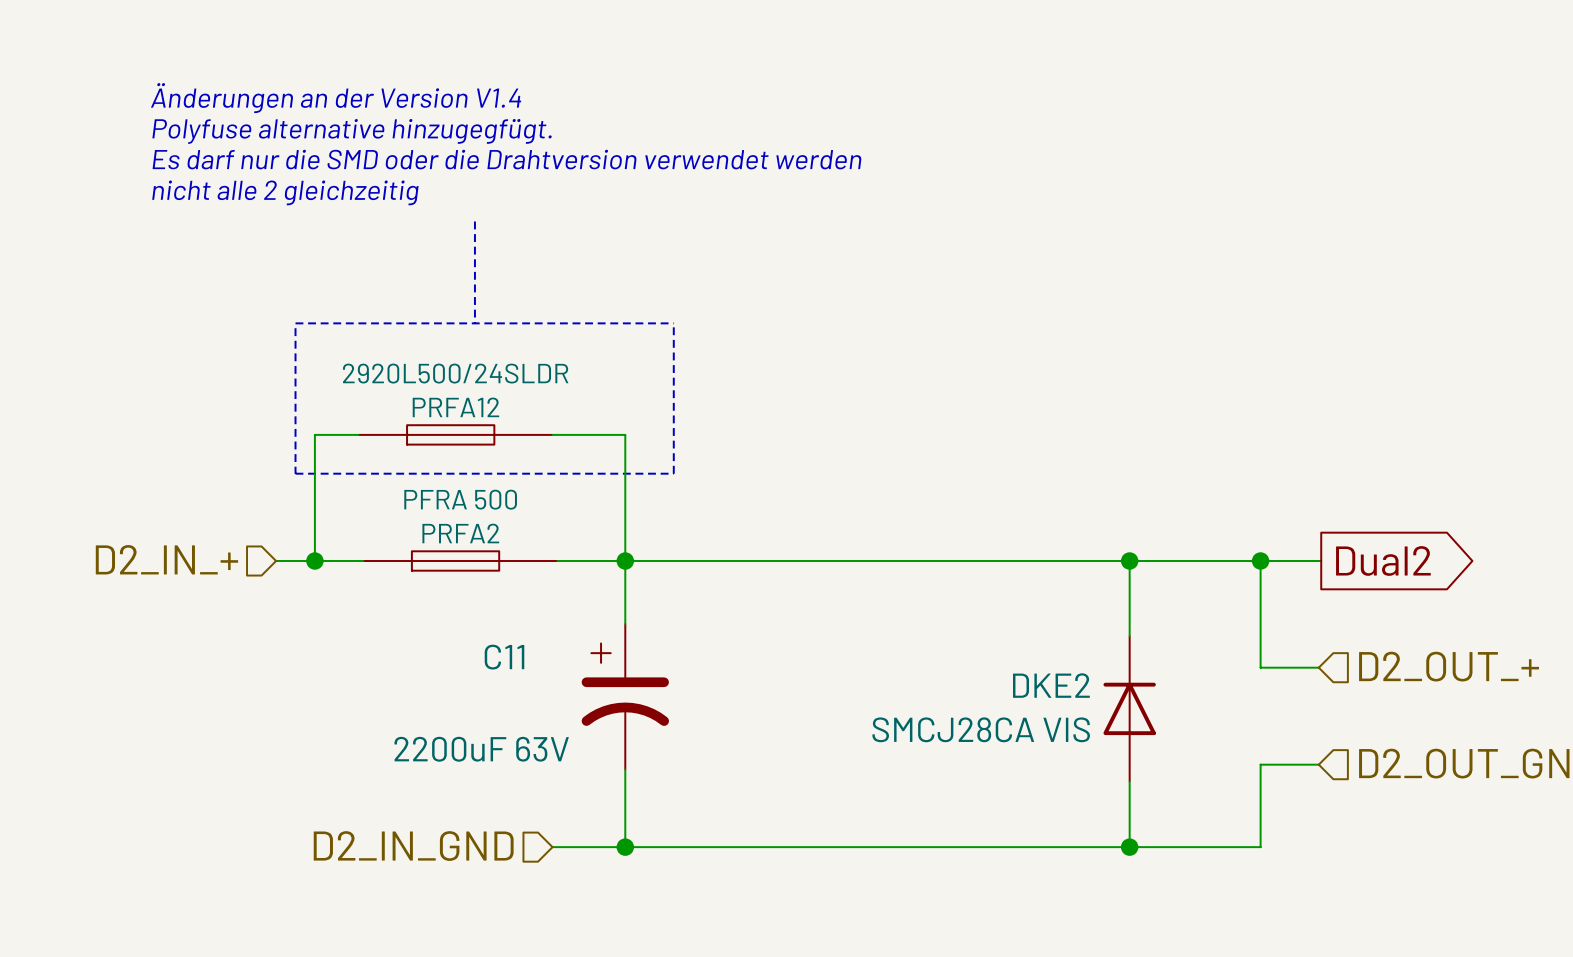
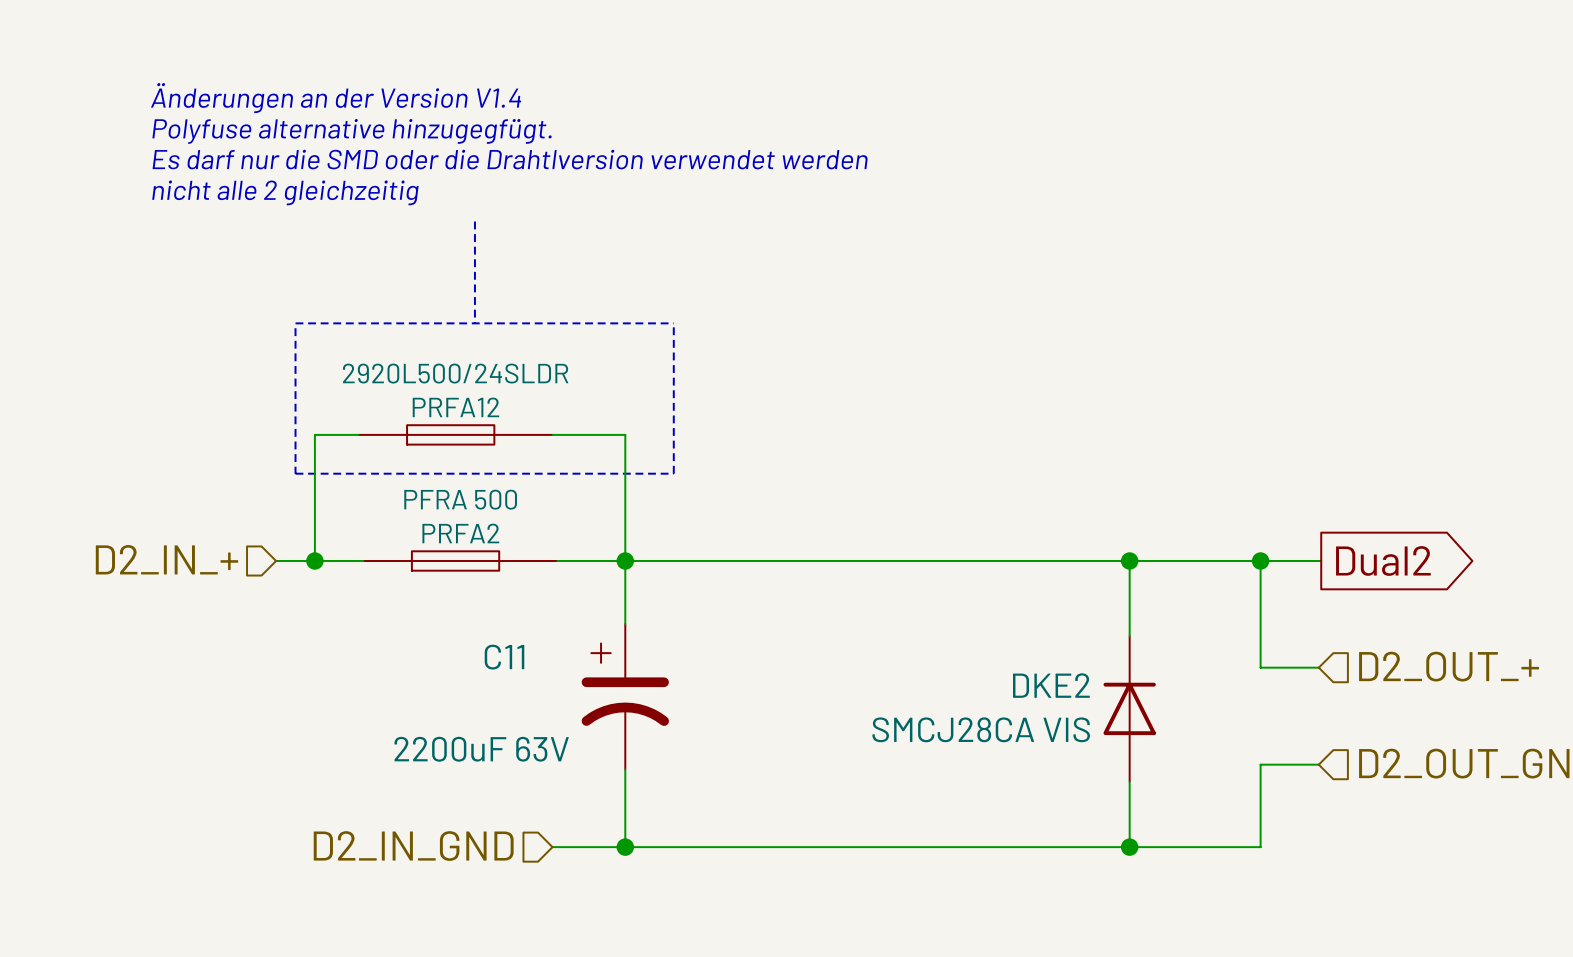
text: Es darf nur die SMD oder die Drahtversion verwendet werden (507, 159) -> Es darf nur die SMD oder die Drahtlversion verwendet werden (510, 159)

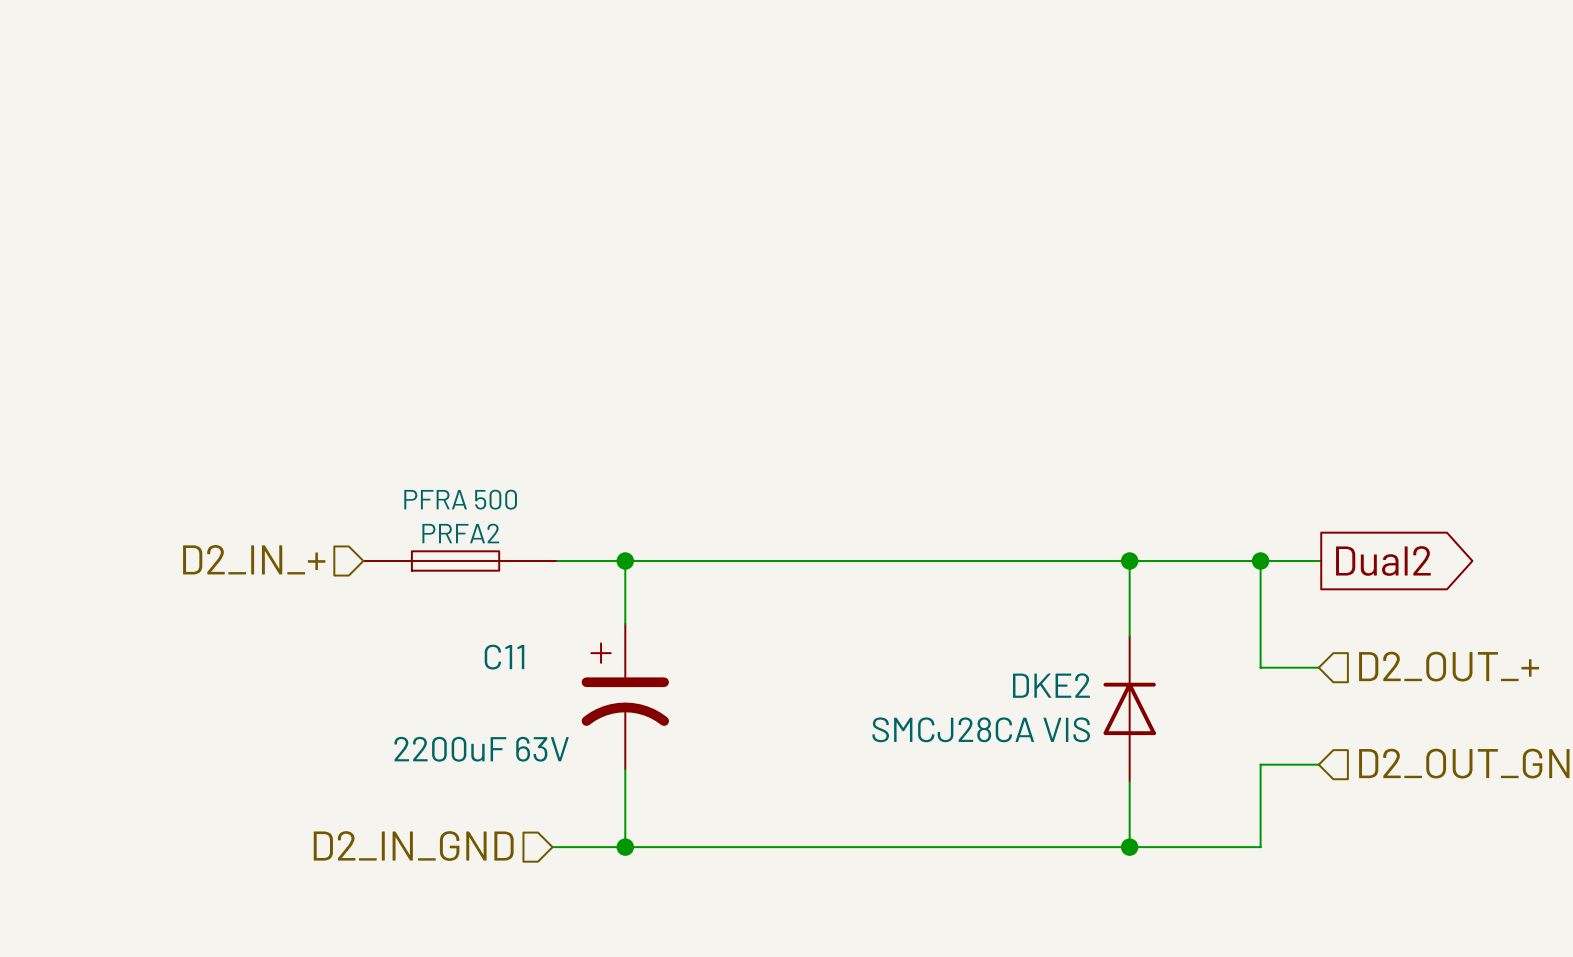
text: Änderungen an der Version V1.4 (336, 98) -> none
text: Polyfuse alternative hinzugegfügt. (352, 131) -> none
text: Es darf nur die SMD oder die Drahtlversion verwendet werden (510, 159) -> none
text: nicht alle 2 gleichzeitig (285, 192) -> none
line: (474, 221) (474, 323) -> none
line: (295, 323) (673, 323) (673, 473) (295, 473) (295, 328) -> none
wire: (358, 434) (314, 434) (314, 560) -> none
PRFA12: 2920L500/24SLDR (455, 434) -> none
wire: (552, 434) (625, 434) (625, 560) -> none
hierarchical label position: D2_IN_+ (166, 559) -> D2_IN_+ (254, 559)
wire: (276, 560) (363, 560) -> none
junction: (314, 560) -> none

